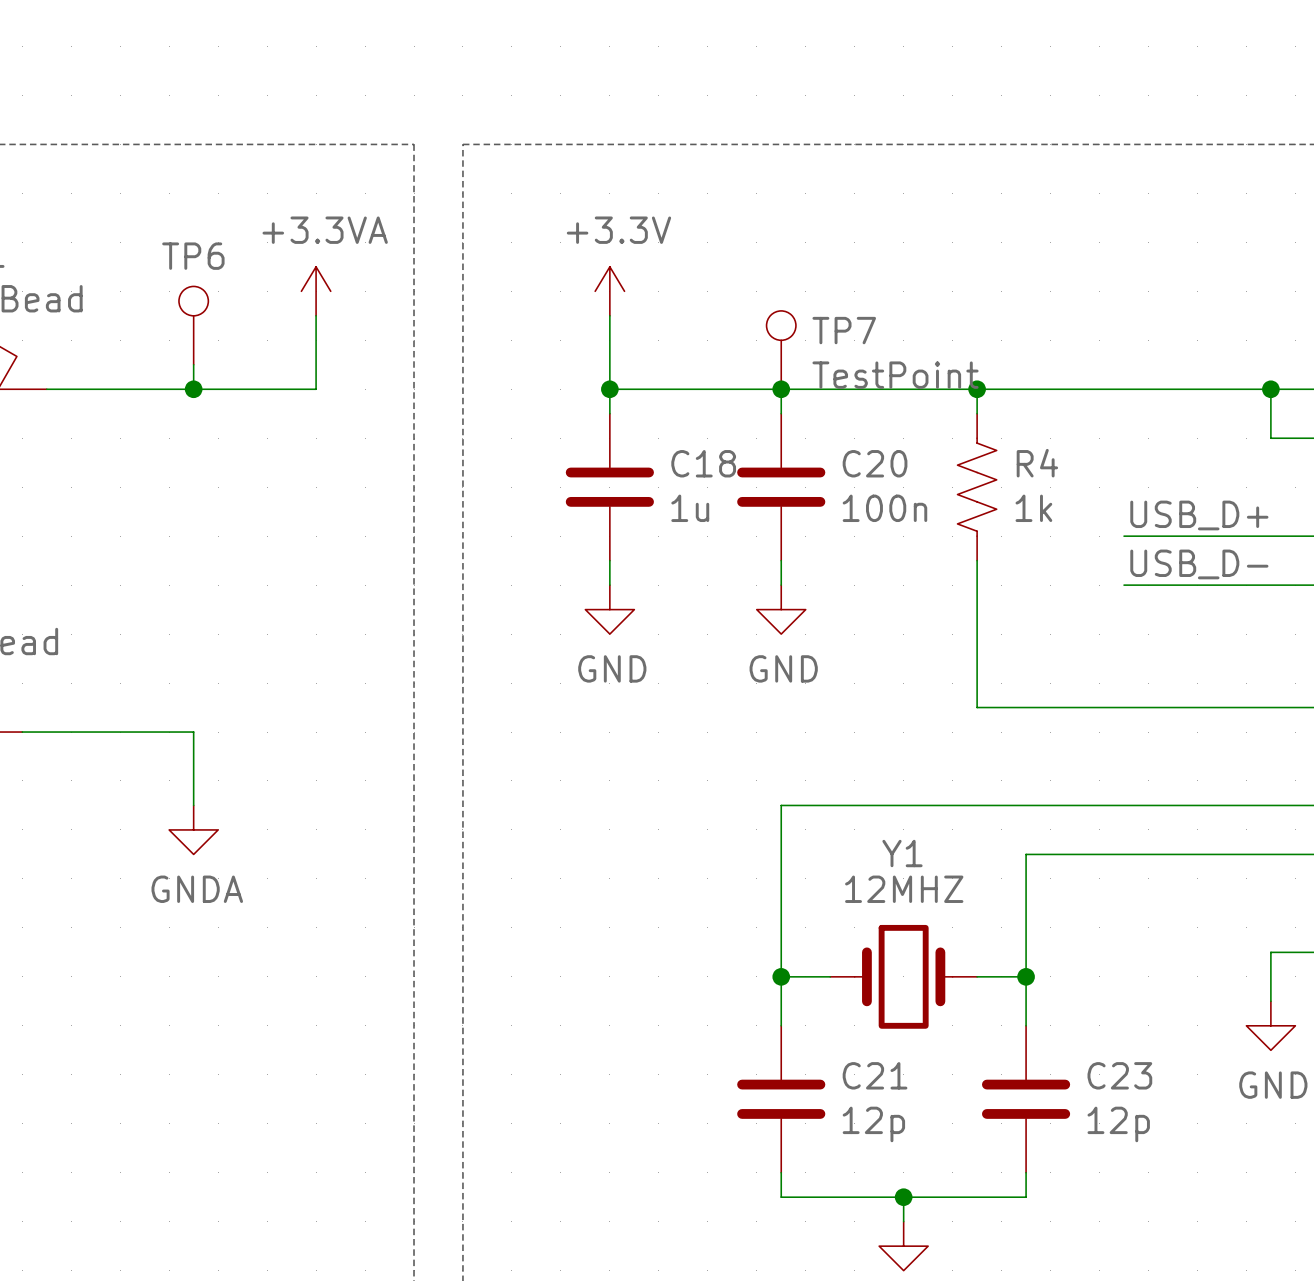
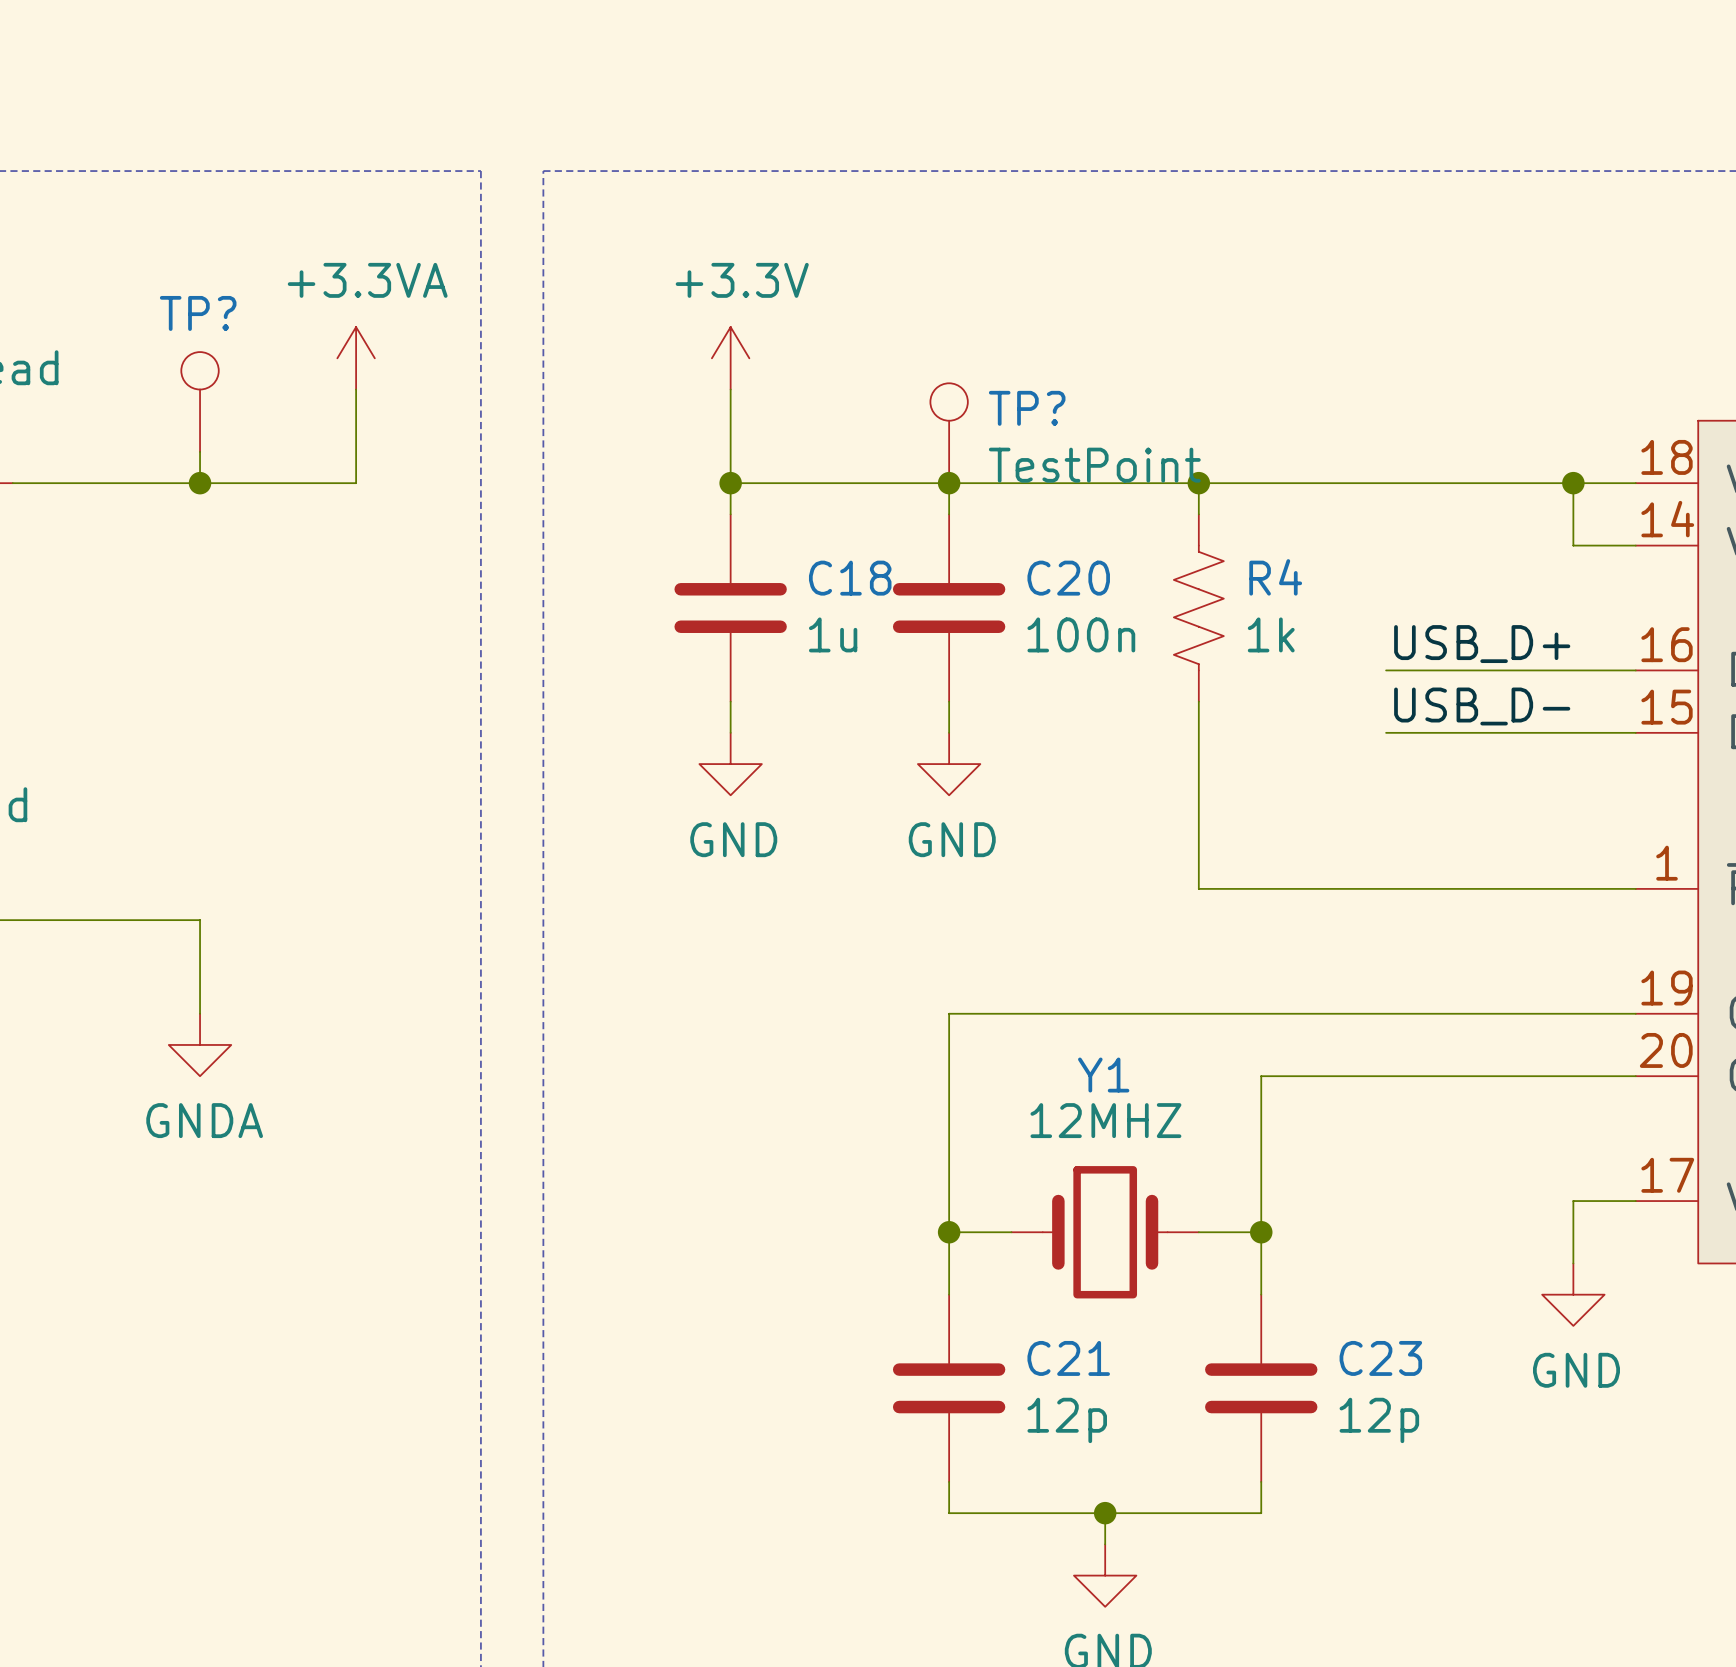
TP6 name: TP6 (193, 256) -> TP? (198, 313)
TP7 name: TP7 (844, 330) -> TP? (1027, 408)

